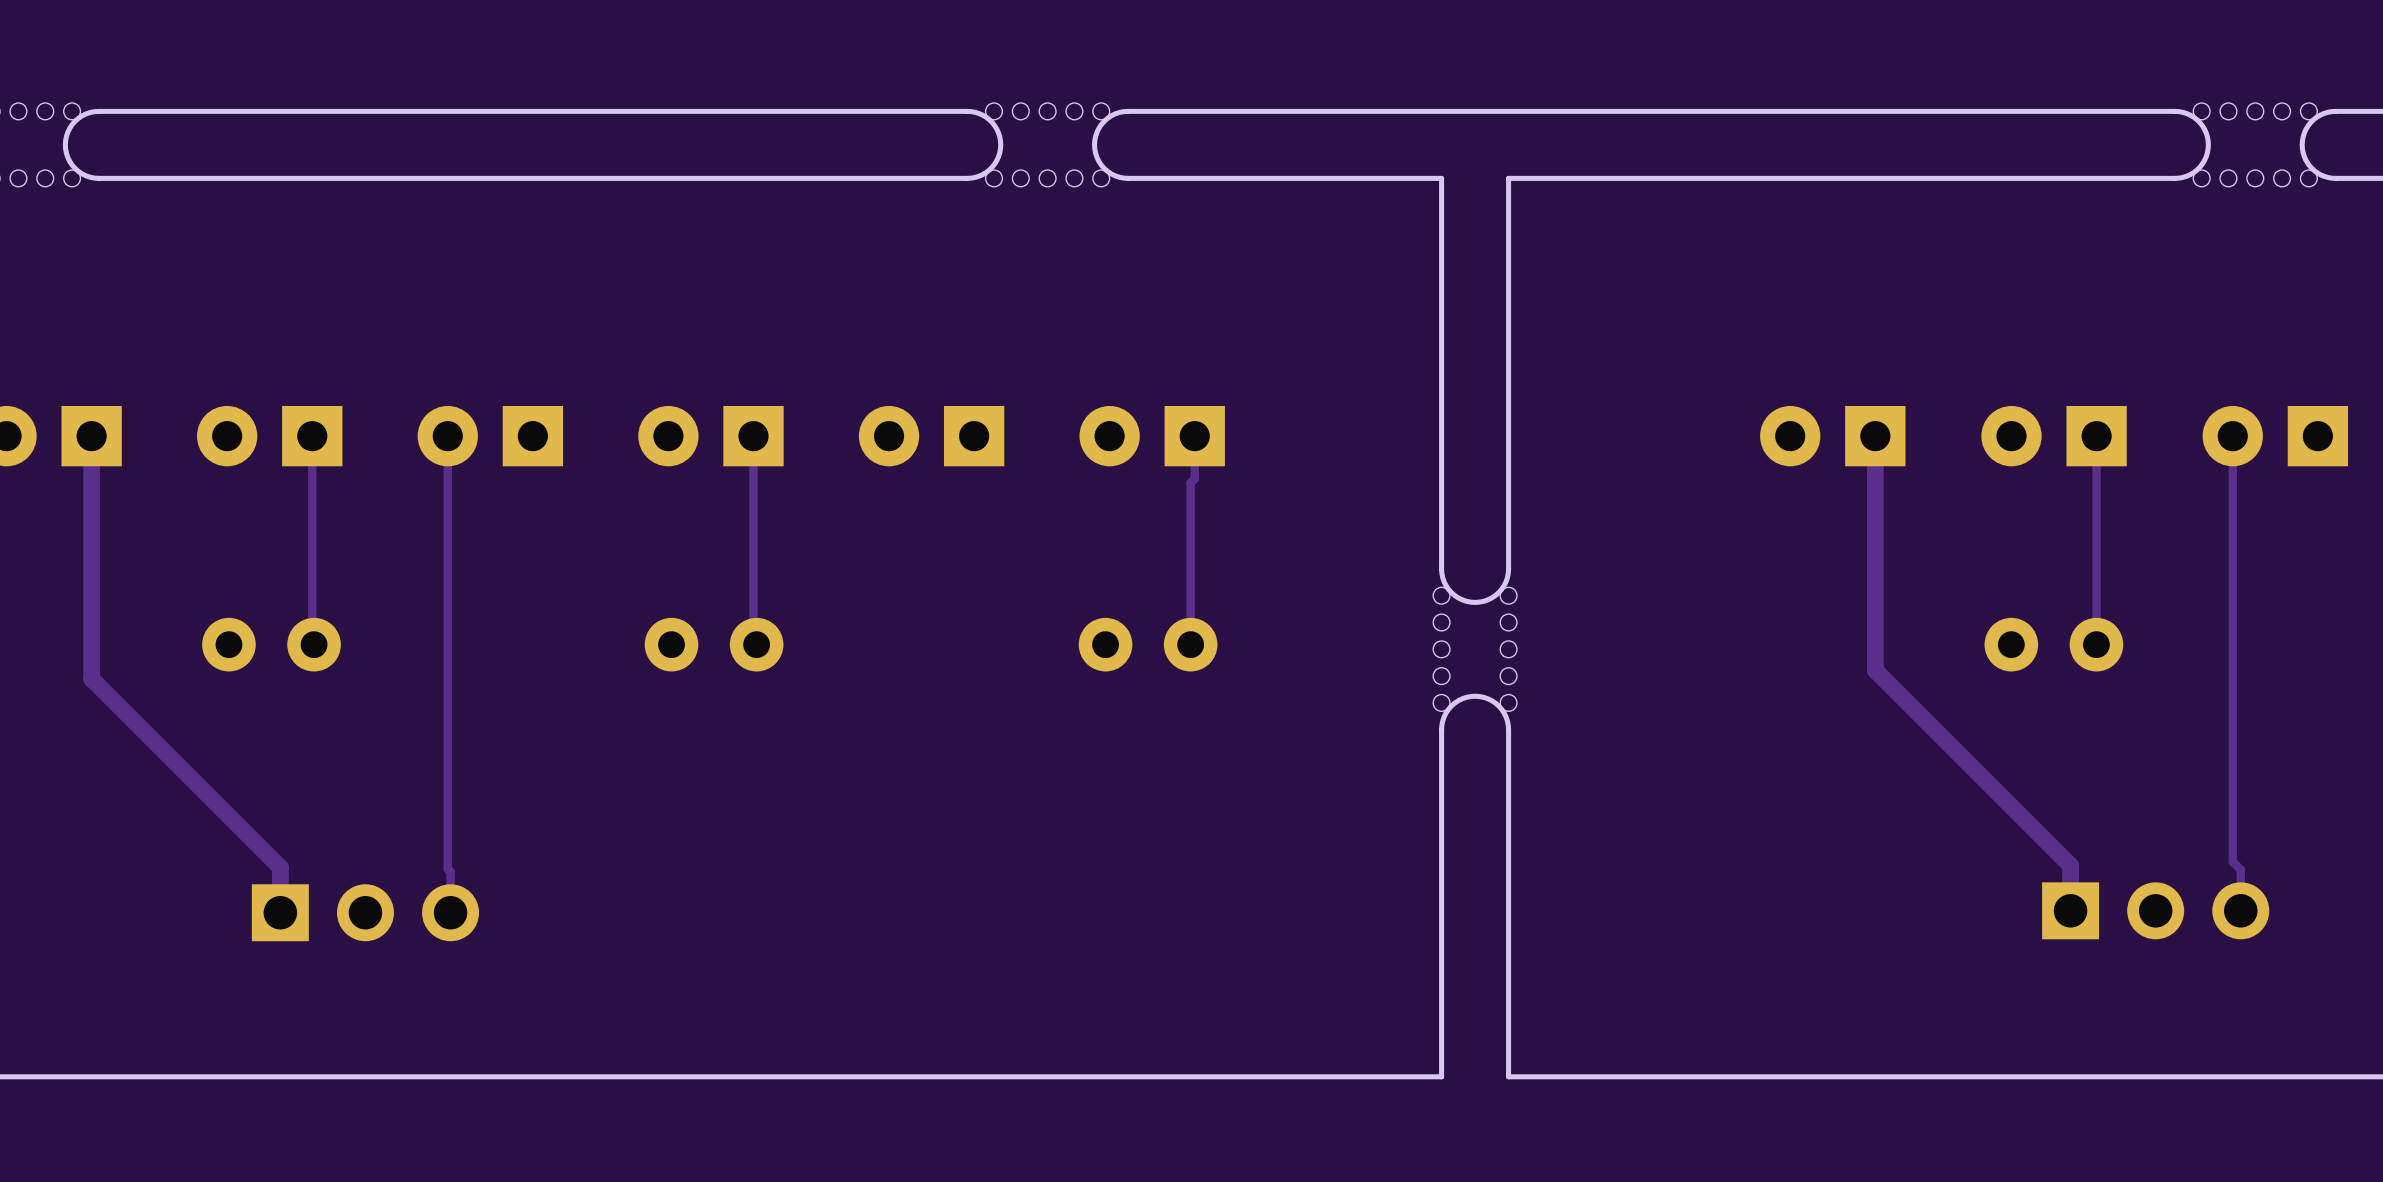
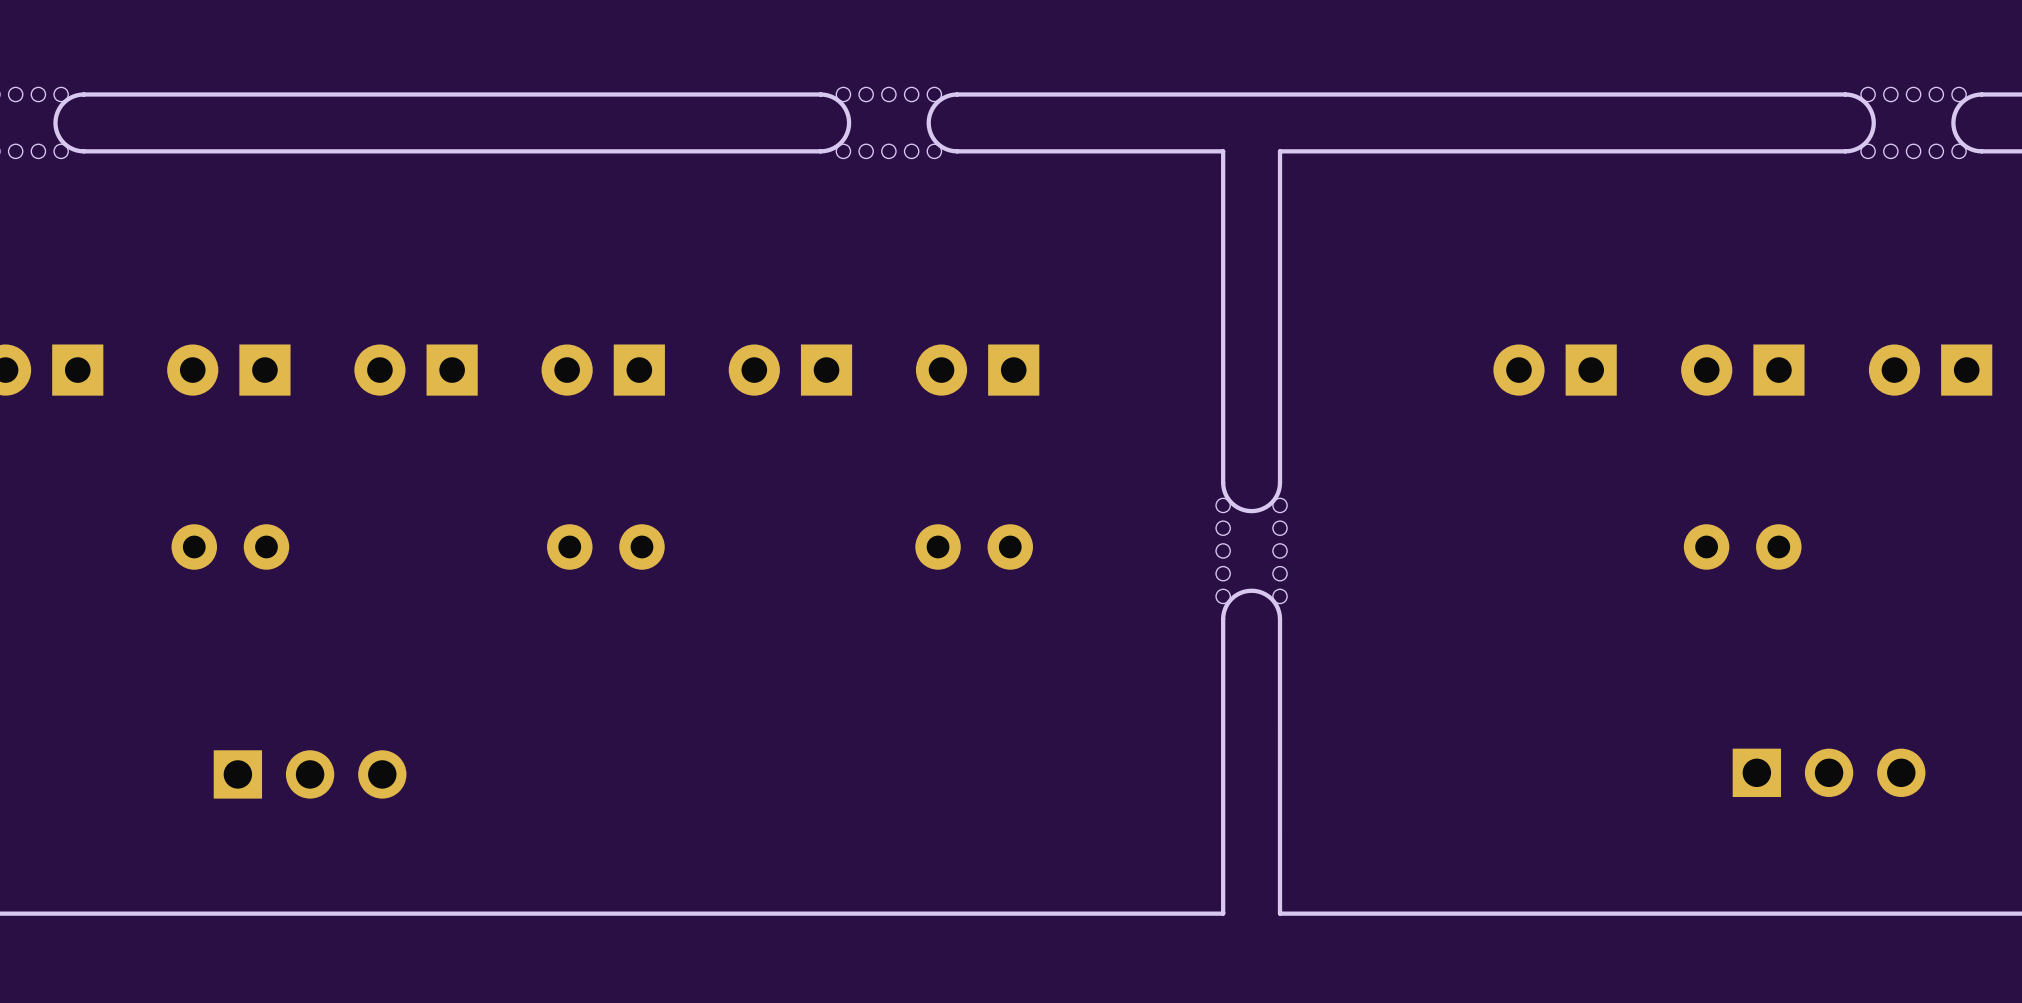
track: (91, 436) (91, 678) (280, 867) (280, 912) -> none
track: (312, 436) (312, 642) (314, 644) -> none
track: (447, 436) (447, 868) (450, 871) (450, 912) -> none
track: (753, 436) (753, 641) (756, 644) -> none
track: (1194, 436) (1194, 478) (1190, 482) (1190, 644) -> none
track: (1875, 436) (1875, 670) (2070, 865) (2070, 910) -> none
track: (2096, 436) (2096, 644) -> none
track: (2232, 436) (2232, 861) (2240, 869) (2240, 910) -> none

